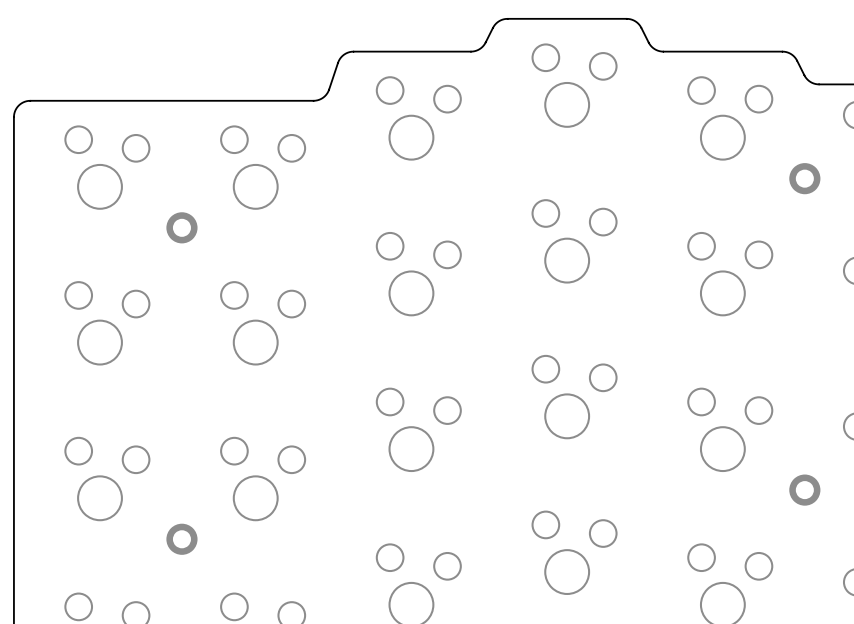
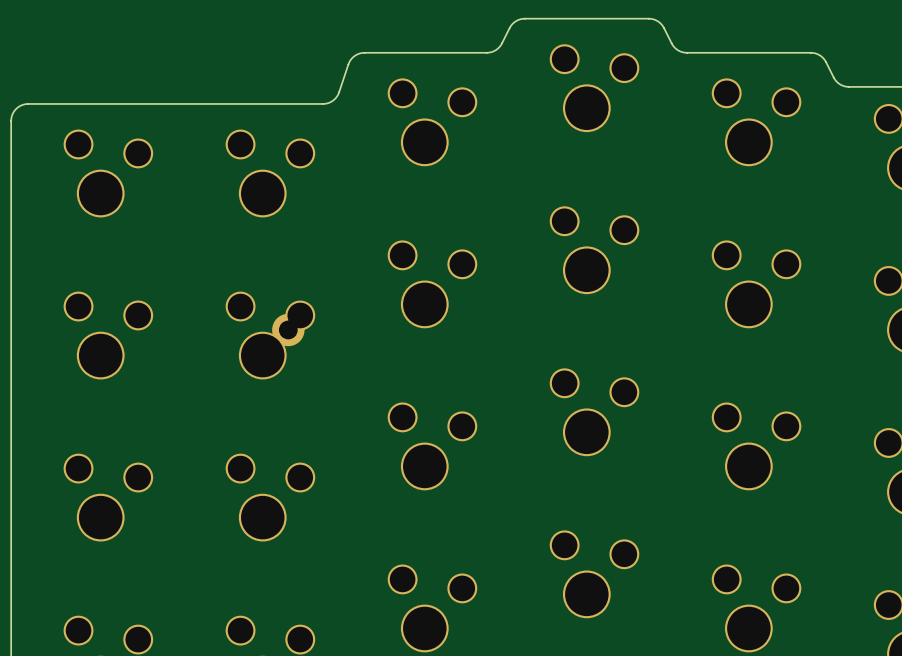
part: (804, 178) -> none
part: (181, 227) -> none
part: none -> (288, 329)
part: (804, 490) -> none
part: (181, 539) -> none

